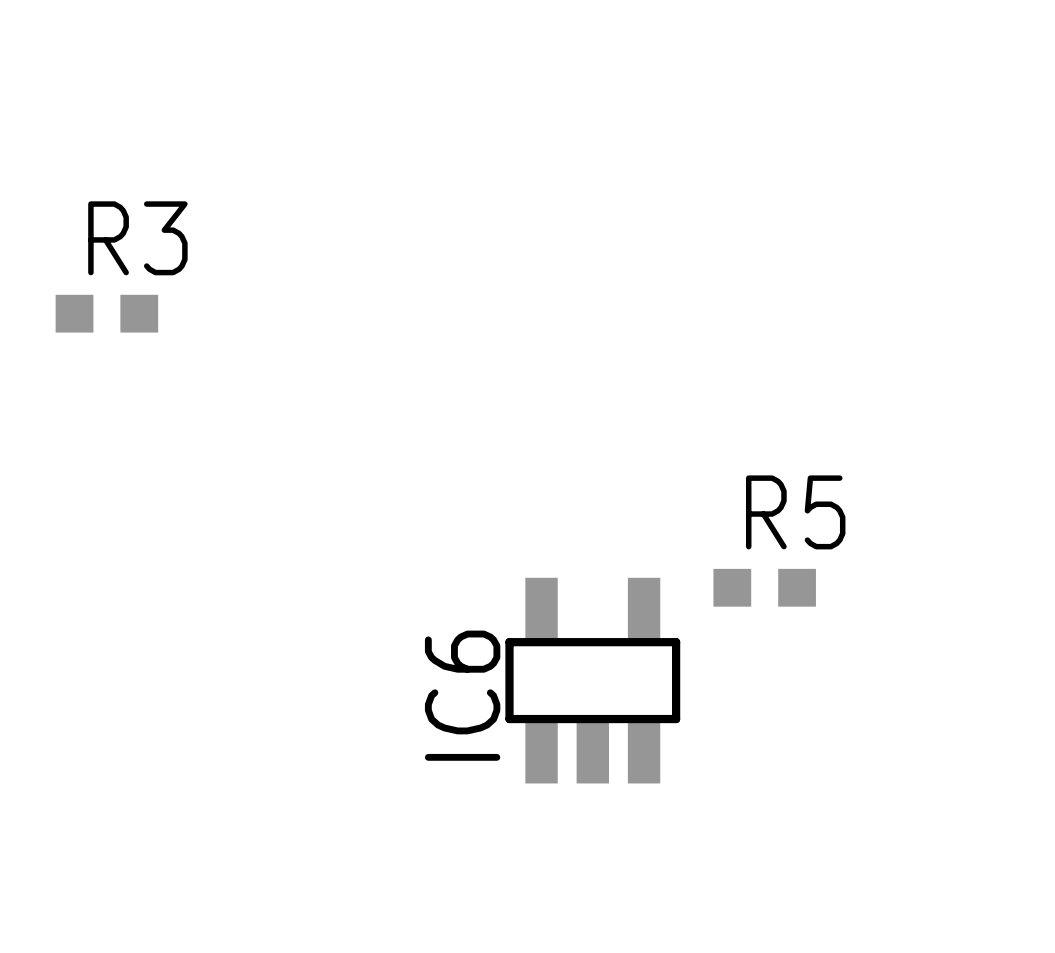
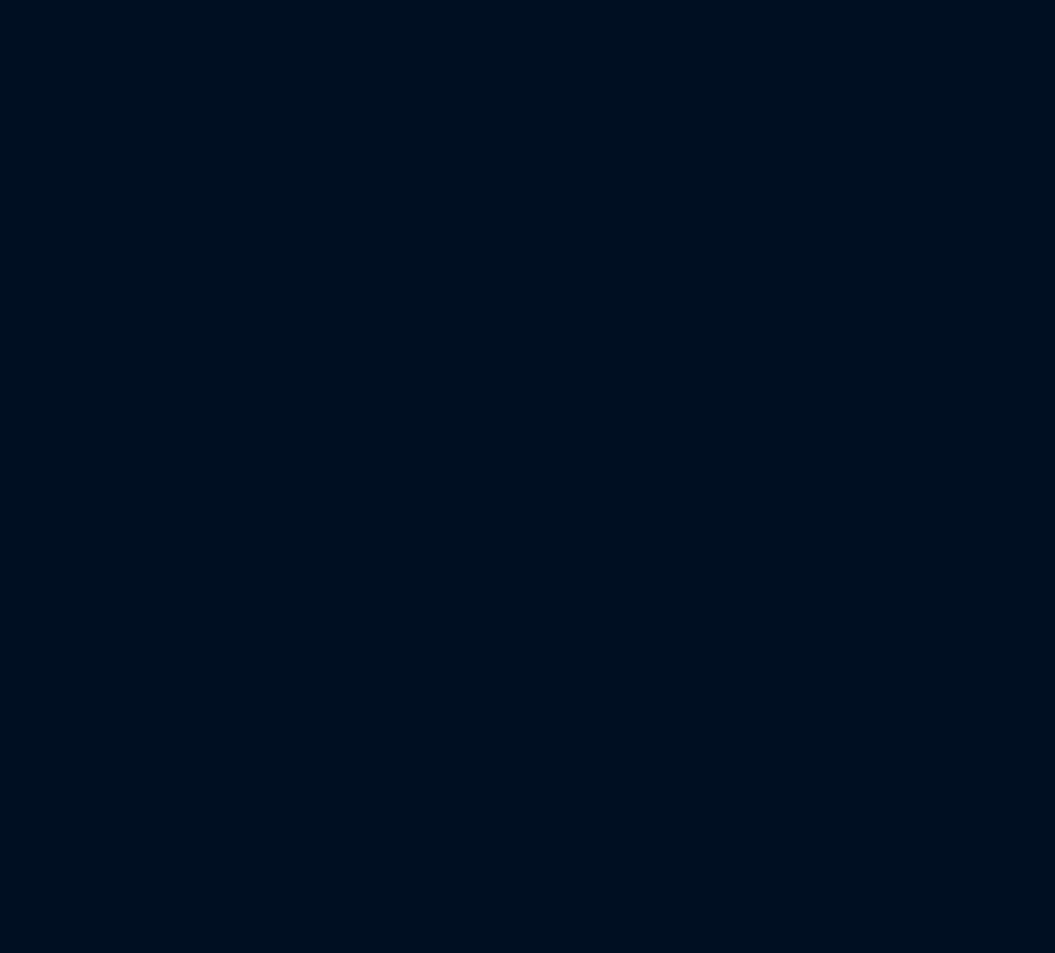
R3: (106, 313) -> none
R5: (764, 587) -> none
IC6: (592, 680) -> none

